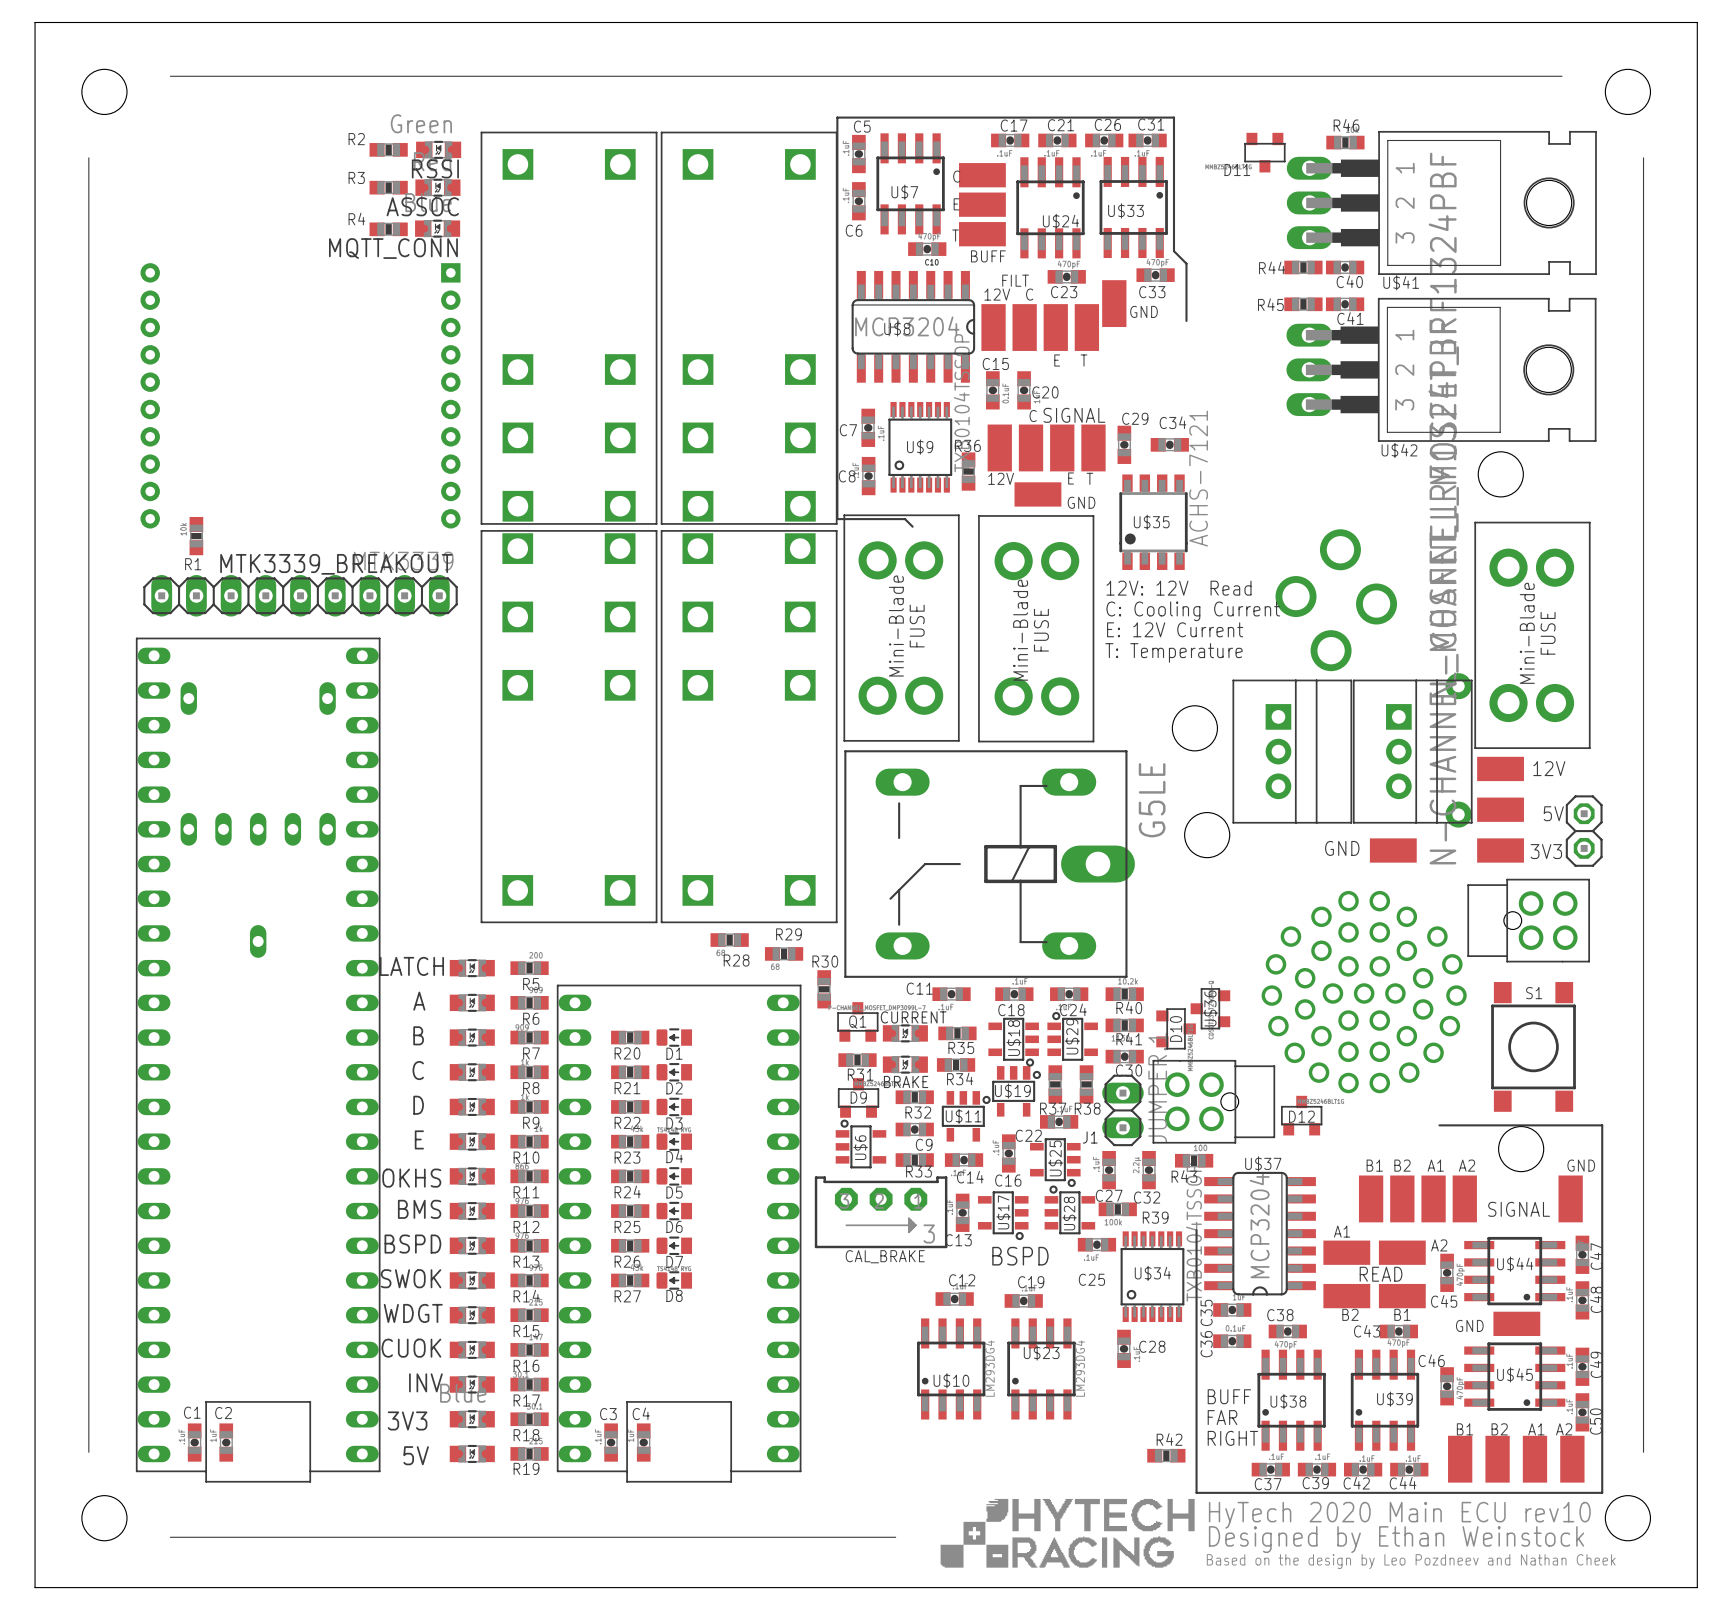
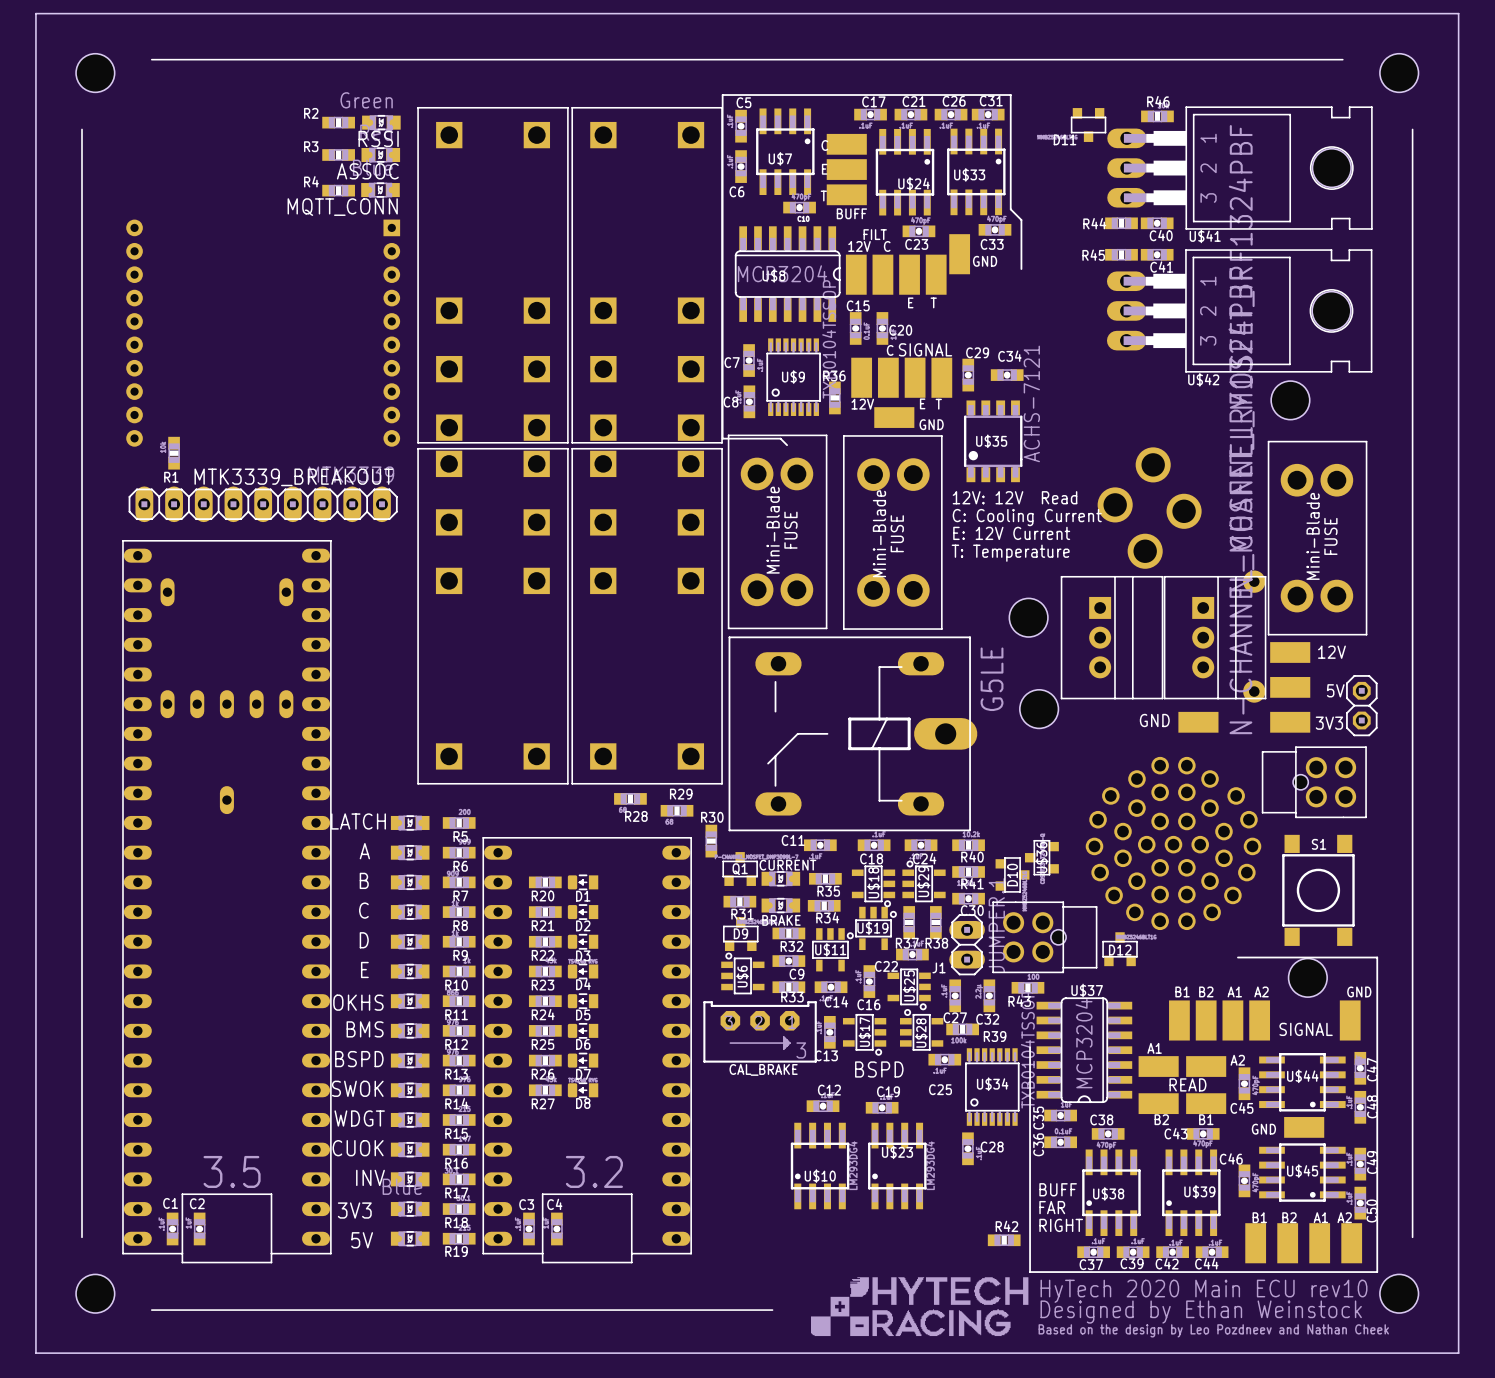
text: none -> 3.5 (232, 1171)
text: none -> 3.2 (594, 1171)

